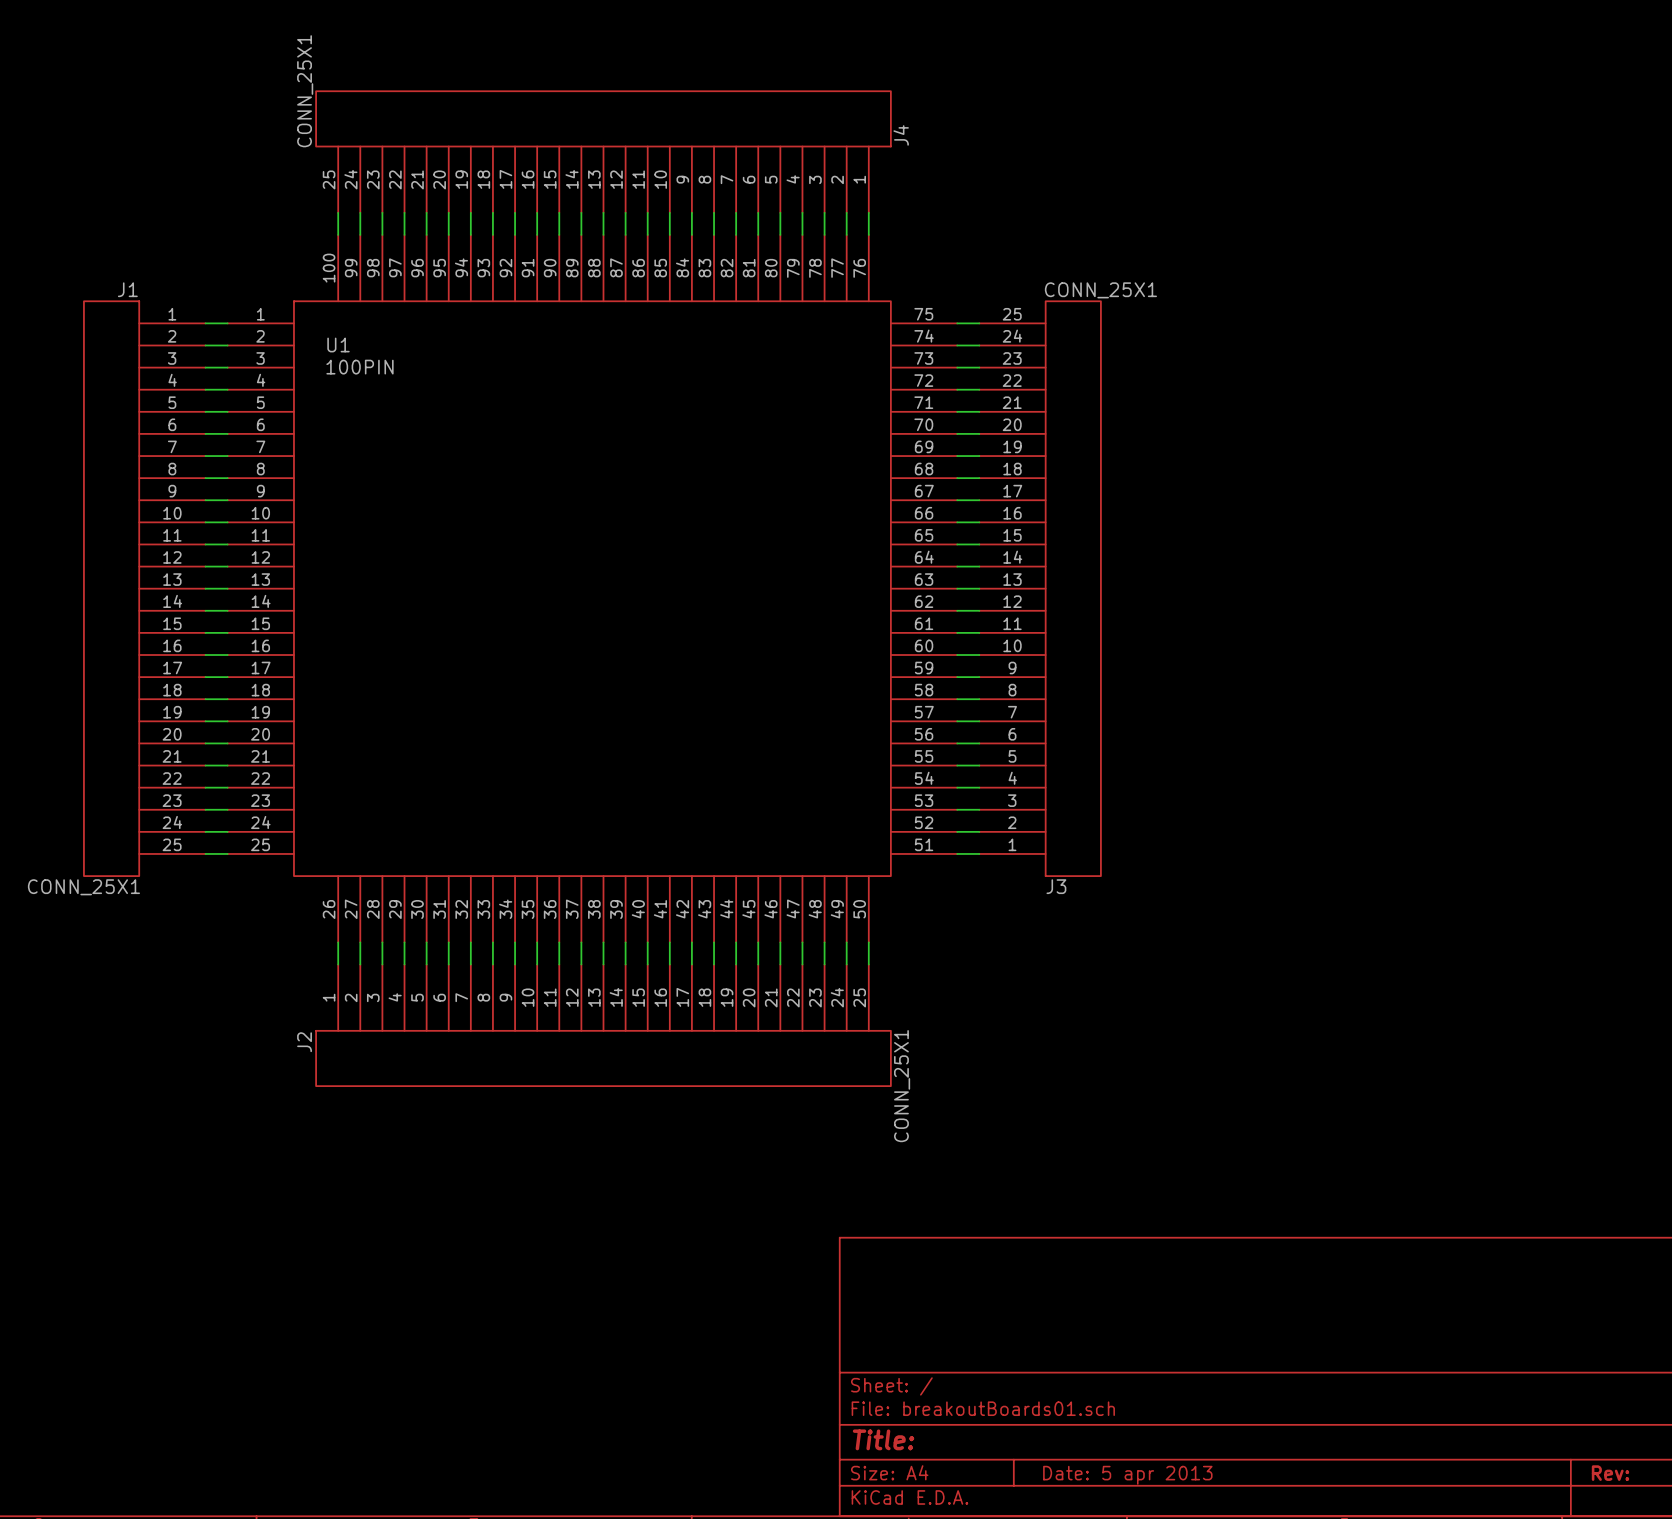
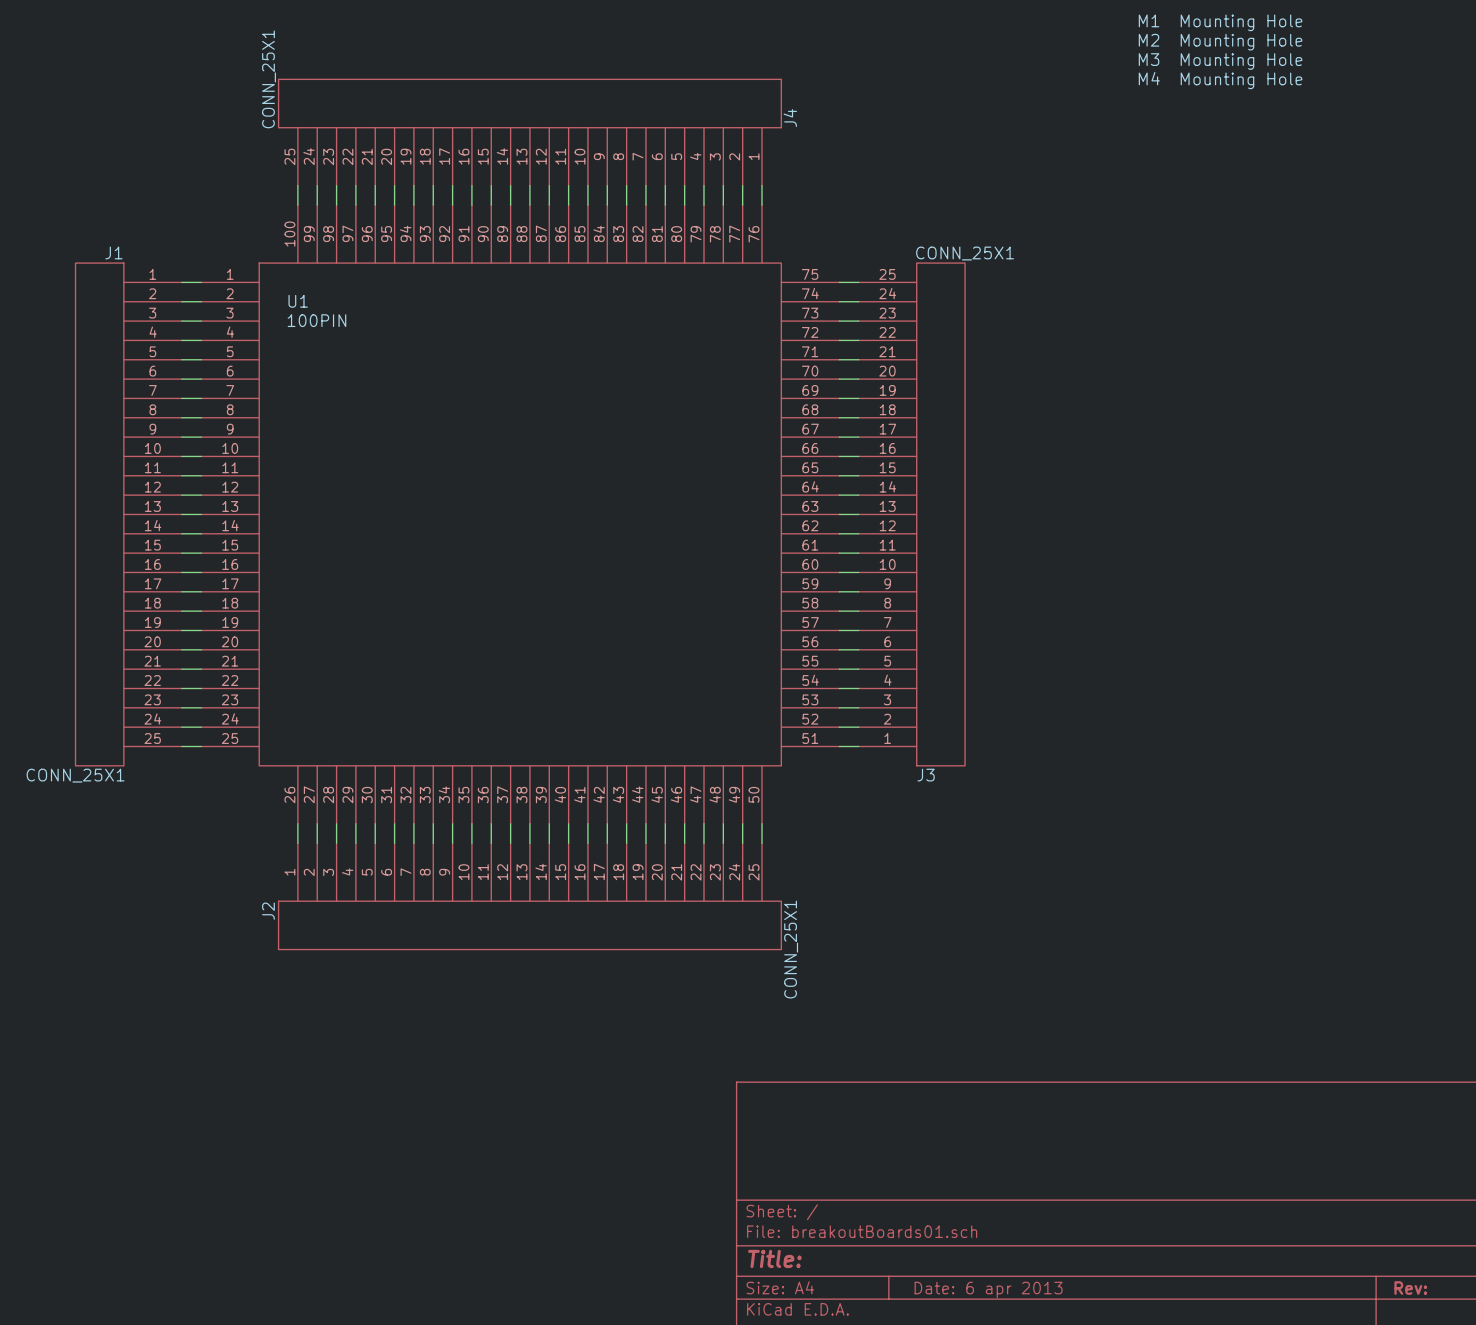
M1: none -> Mounting Hole (1220, 22)
M2: none -> Mounting Hole (1220, 42)
M3: none -> Mounting Hole (1220, 61)
M4: none -> Mounting Hole (1220, 80)
title block: Date: 5 apr 2013 (1127, 1475) -> Date: 6 apr 2013 (988, 1289)

